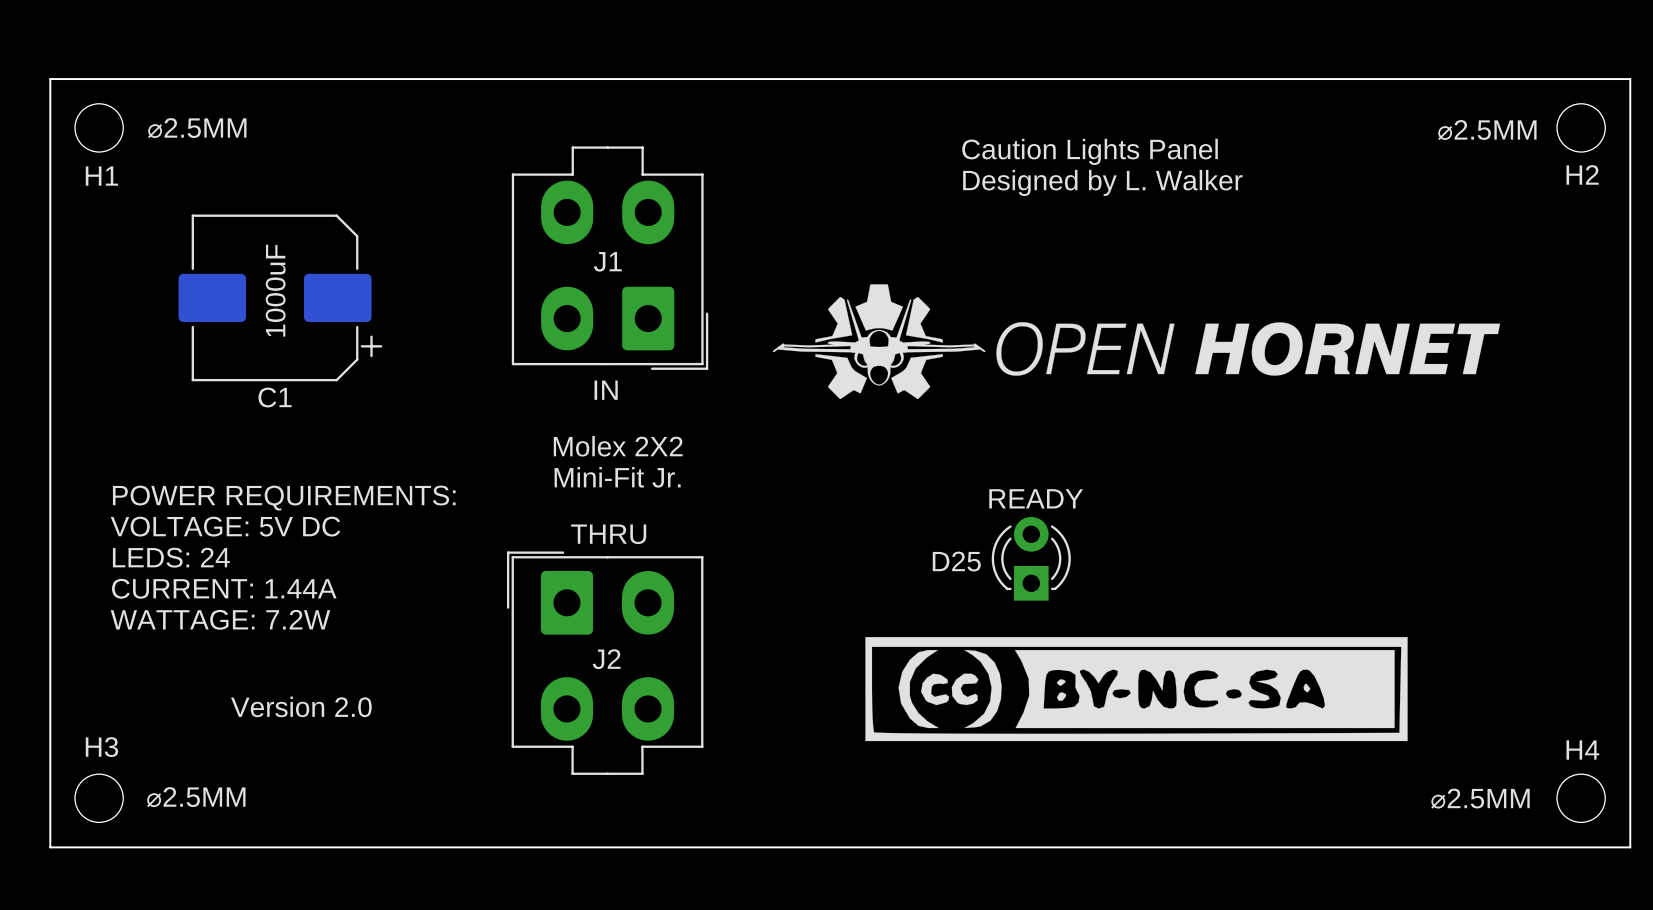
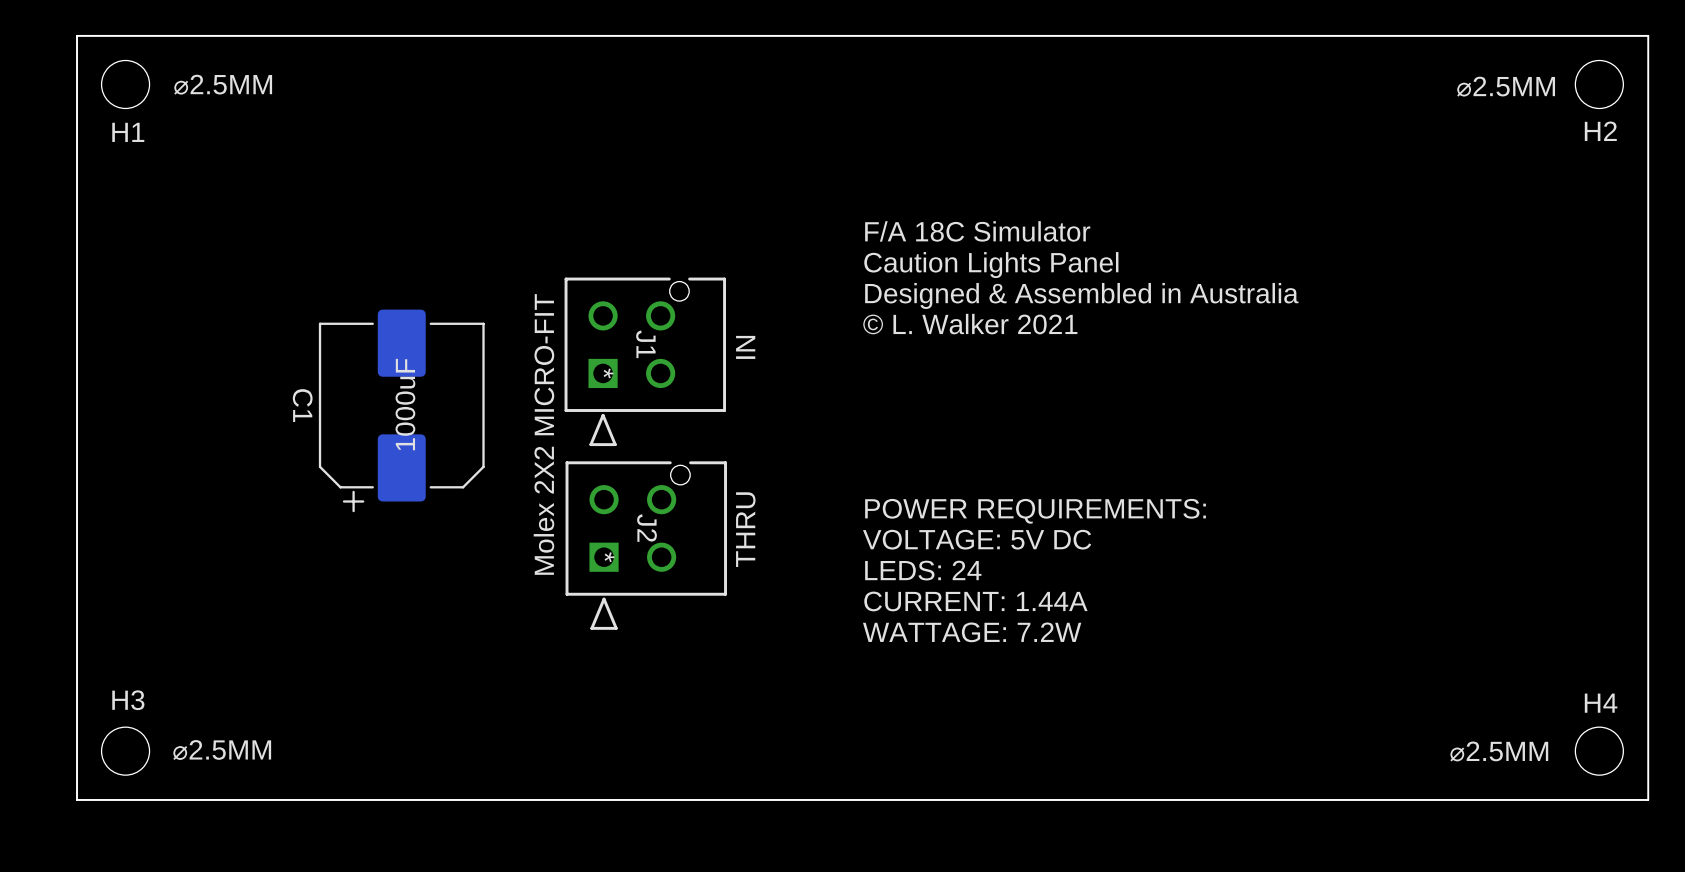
J1 footprint: [511, 146, 709, 370] -> [564, 277, 727, 447]
text position: Caution Lights Panel (1090, 151) -> Caution Lights Panel (991, 265)
text: Designed by L. Walker (1102, 182) -> none
text: none -> F/A 18C Simulator (977, 231)
drawing: [772, 284, 1501, 400] -> none
text position: 1000uF (275, 290) -> 1000uF (405, 404)
C1 rotation: 0° (280, 297) -> 90° clockwise (401, 410)
C1 position: (280, 297) -> (401, 410)
text: none -> Designed & Assembled in Australia (1081, 295)
text: none -> © L. Walker 2021 (970, 324)
text rotation: 0° (606, 390) -> 90° counterclockwise (745, 347)
text position: IN (606, 390) -> IN (745, 347)
text: Molex 2X2 (618, 446) -> Molex 2X2 MICRO-FIT (543, 434)
text: Mini-Fit Jr. (617, 477) -> none
text: POWER REQUIREMENTS: (284, 498) -> none
text: READY (1036, 498) -> none
text: VOLTAGE: 5V DC (225, 526) -> none
text rotation: 0° (608, 534) -> 90° counterclockwise (745, 529)
text position: THRU (608, 534) -> THRU (745, 529)
J2 footprint: [506, 551, 704, 775] -> [565, 461, 727, 630]
text: LEDS: 24 (171, 557) -> none
text: none -> POWER REQUIREMENTS: (1035, 511)
D25: (1031, 558) -> none
text: none -> VOLTAGE: 5V DC (977, 539)
text: CURRENT: 1.44A (224, 588) -> none
text: none -> LEDS: 24 (923, 570)
text: WATTAGE: 7.2W (220, 619) -> none
drawing: [865, 637, 1408, 742] -> none
text: none -> CURRENT: 1.44A (975, 601)
text: none -> WATTAGE: 7.2W (972, 632)
text: Version 2.0 (301, 706) -> none

